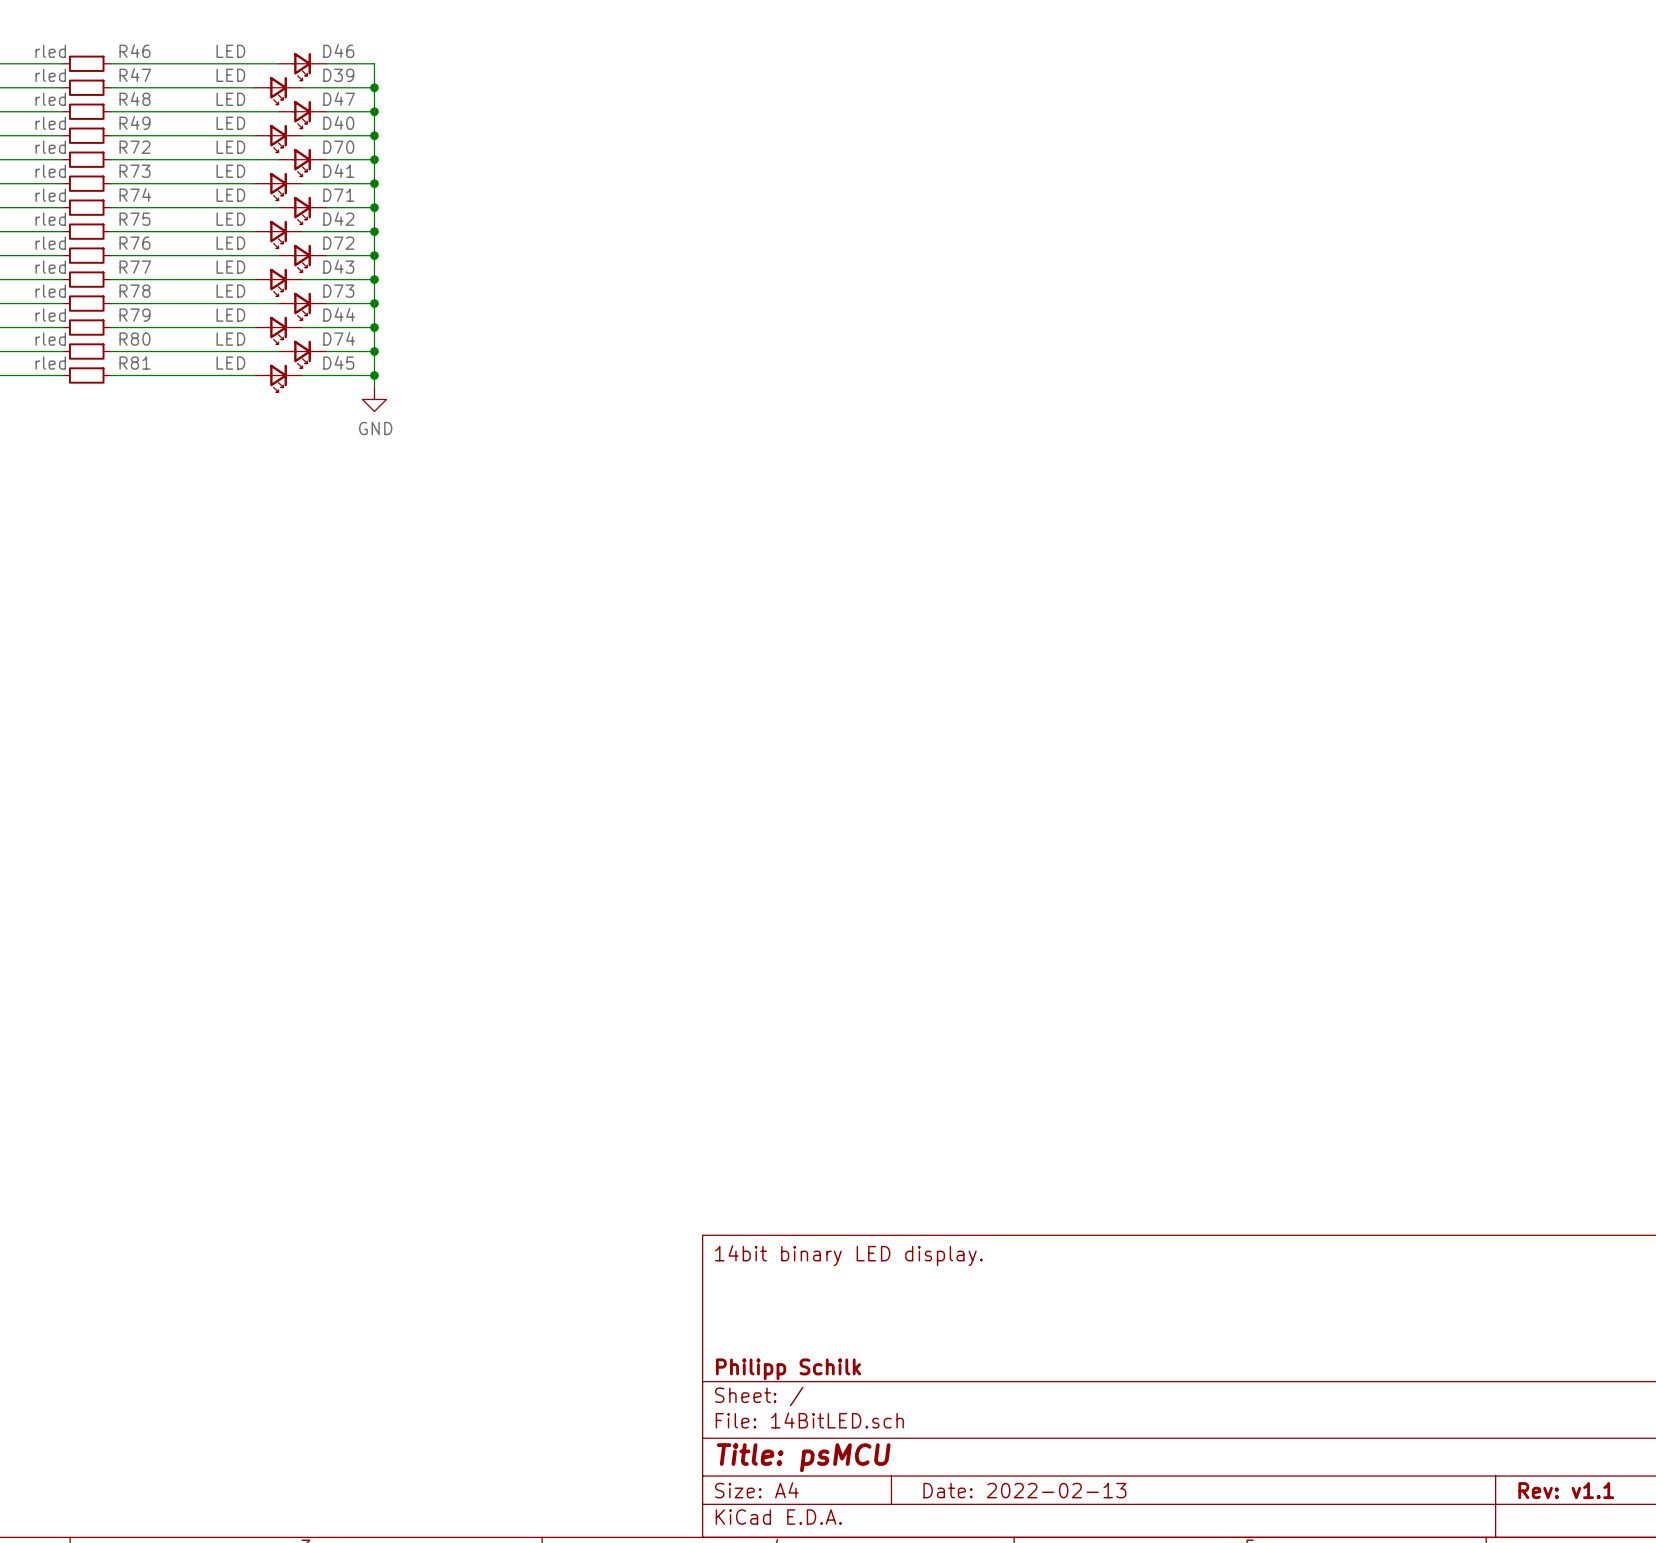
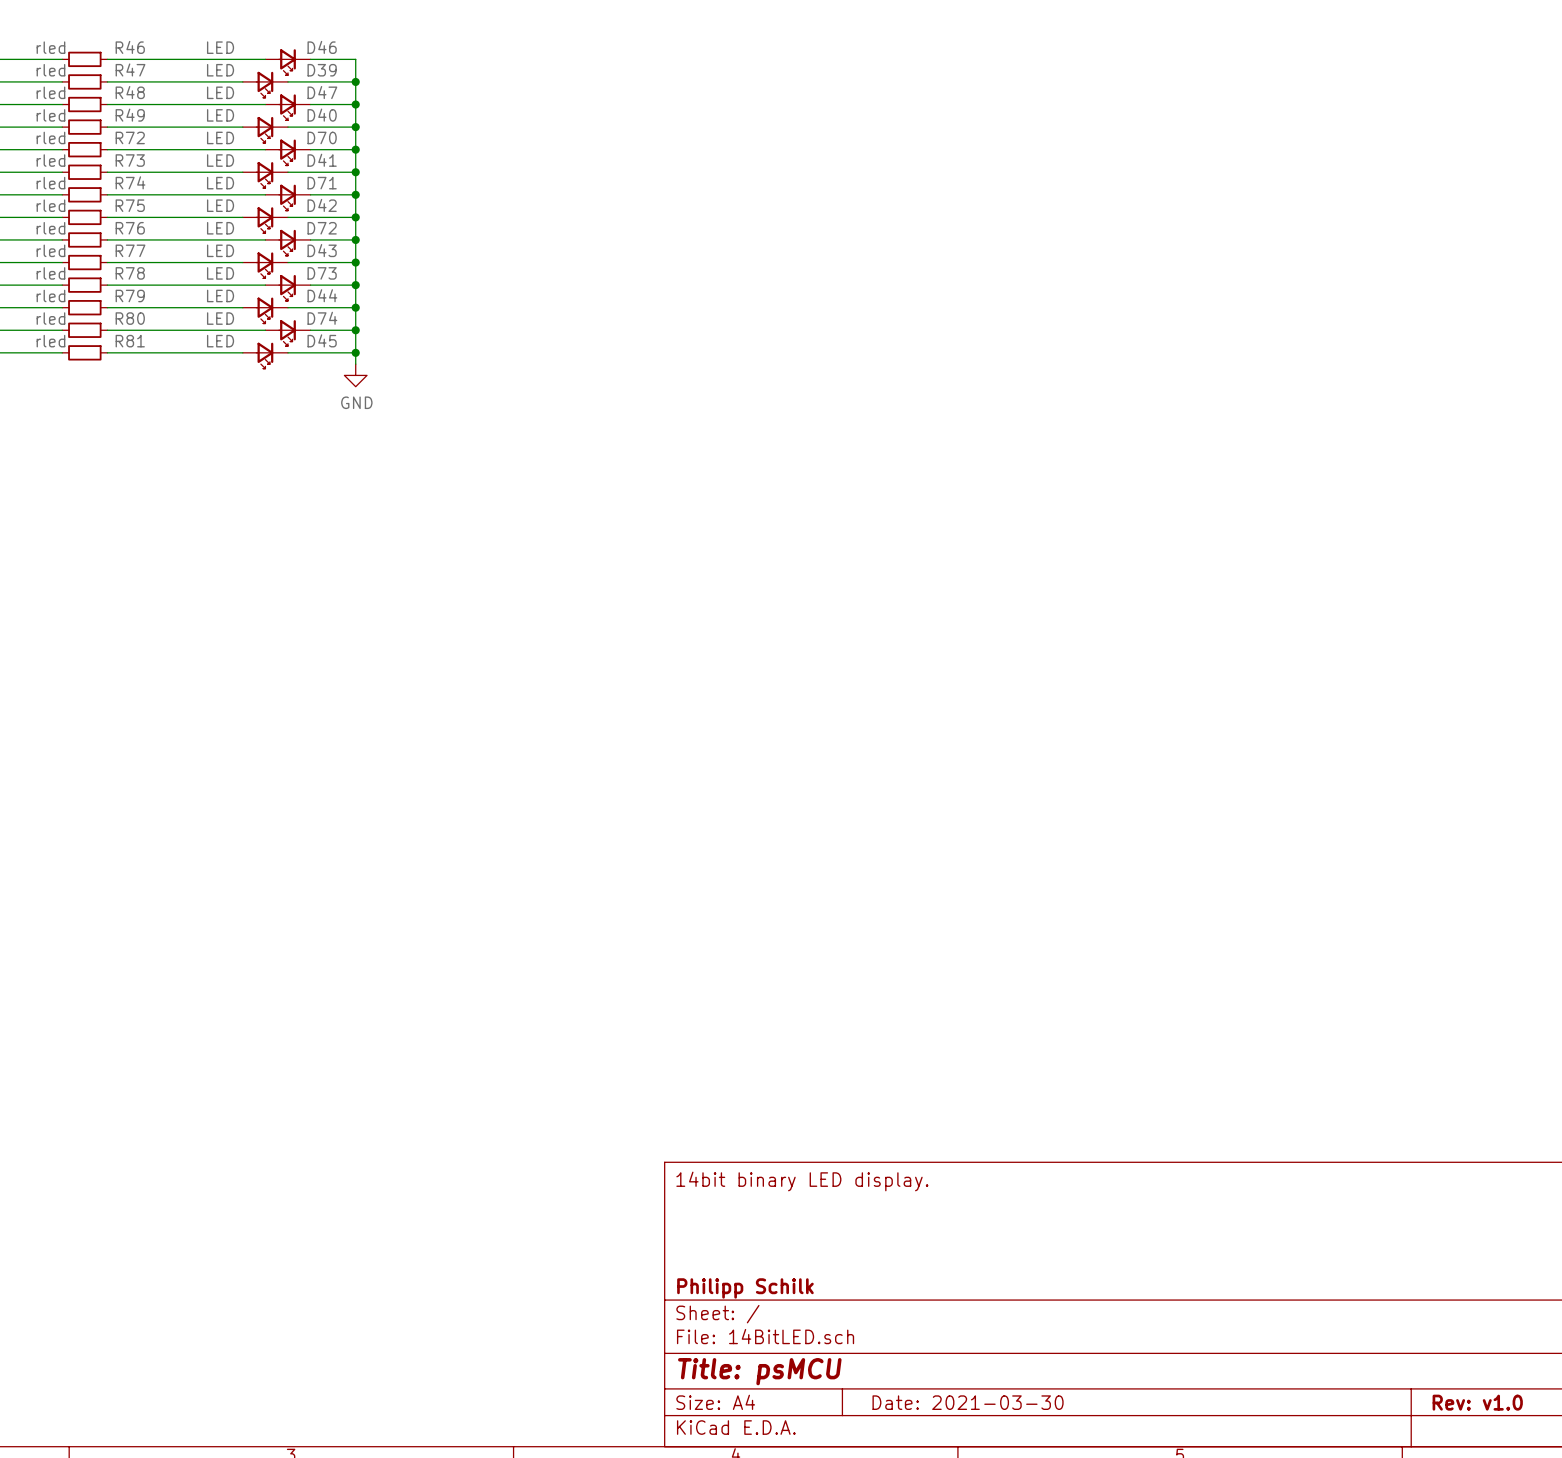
title block: Date: 2022-02-13 (1024, 1490) -> Date: 2021-03-30 (968, 1402)
title block: Rev: v1.1 (1566, 1490) -> Rev: v1.0 (1477, 1402)

